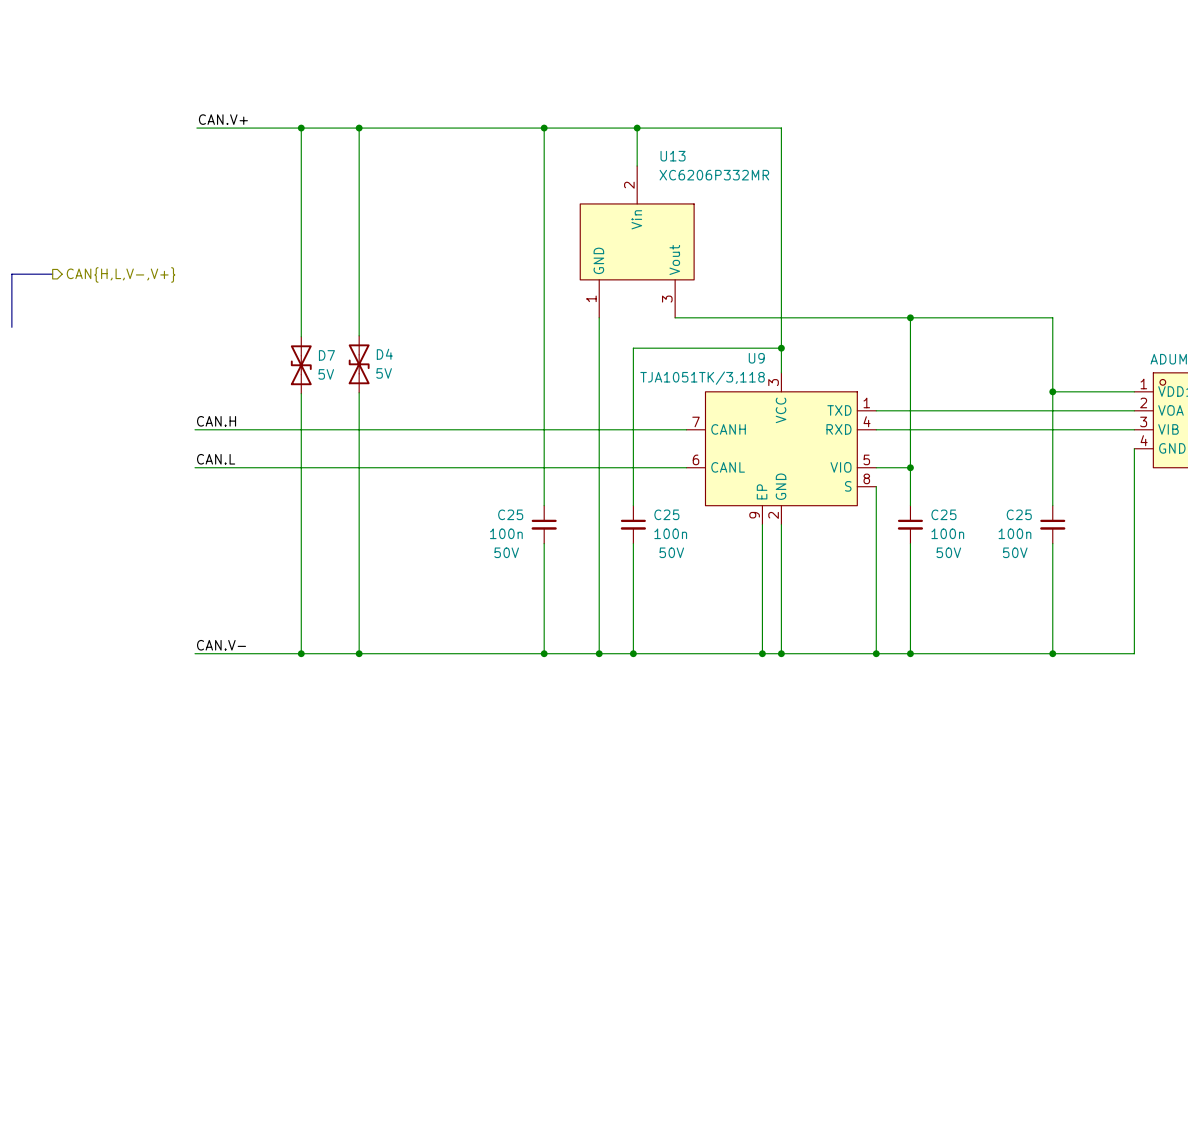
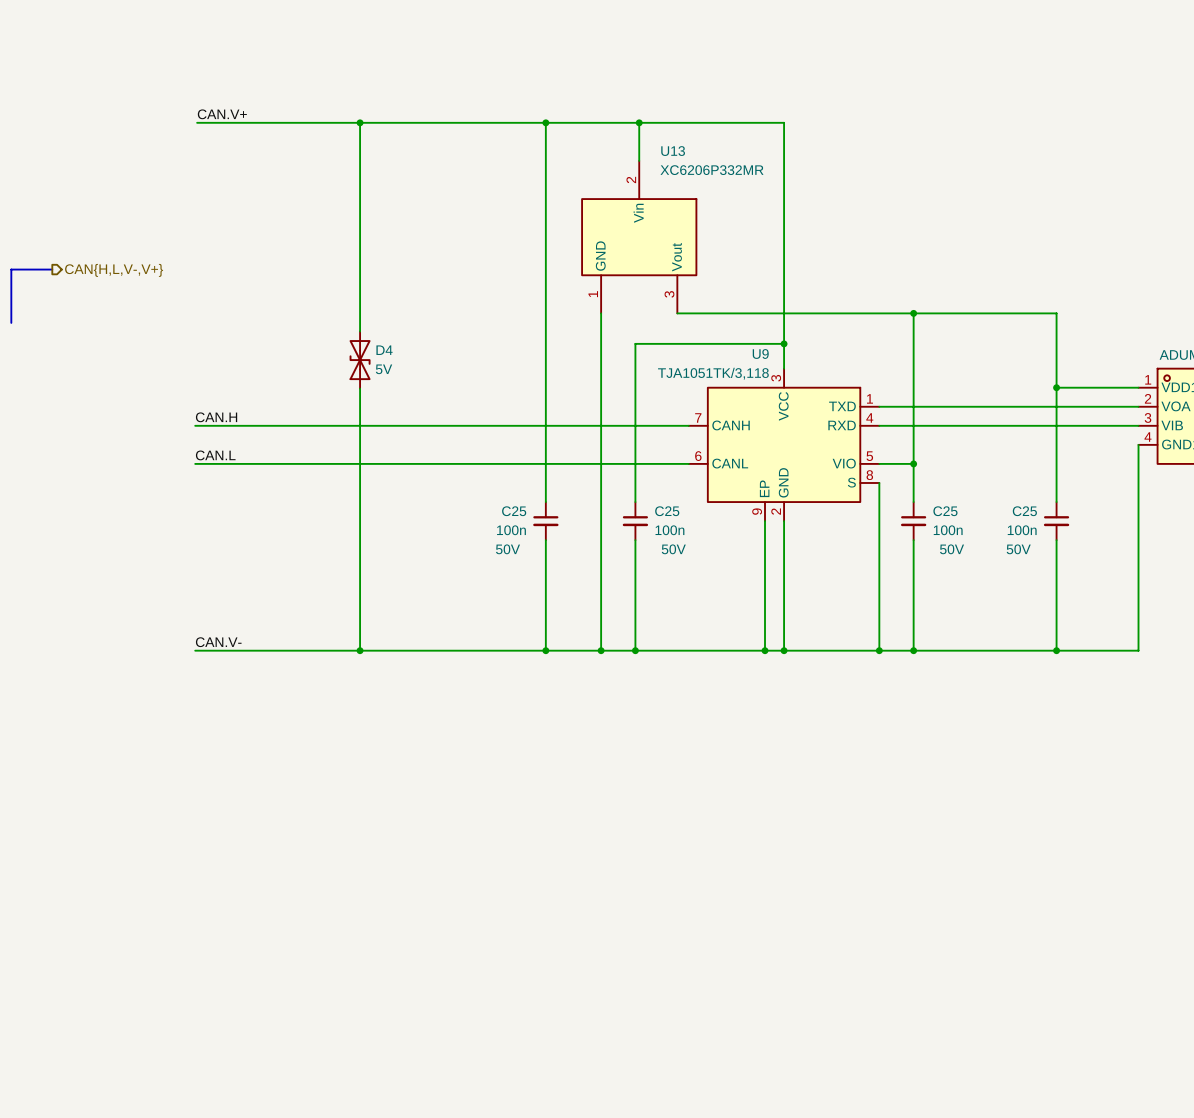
wire: (301, 128) (301, 336) -> none
junction: (301, 128) -> none
D7: 5V (301, 365) -> none
wire: (301, 393) (301, 653) -> none
junction: (301, 653) -> none

